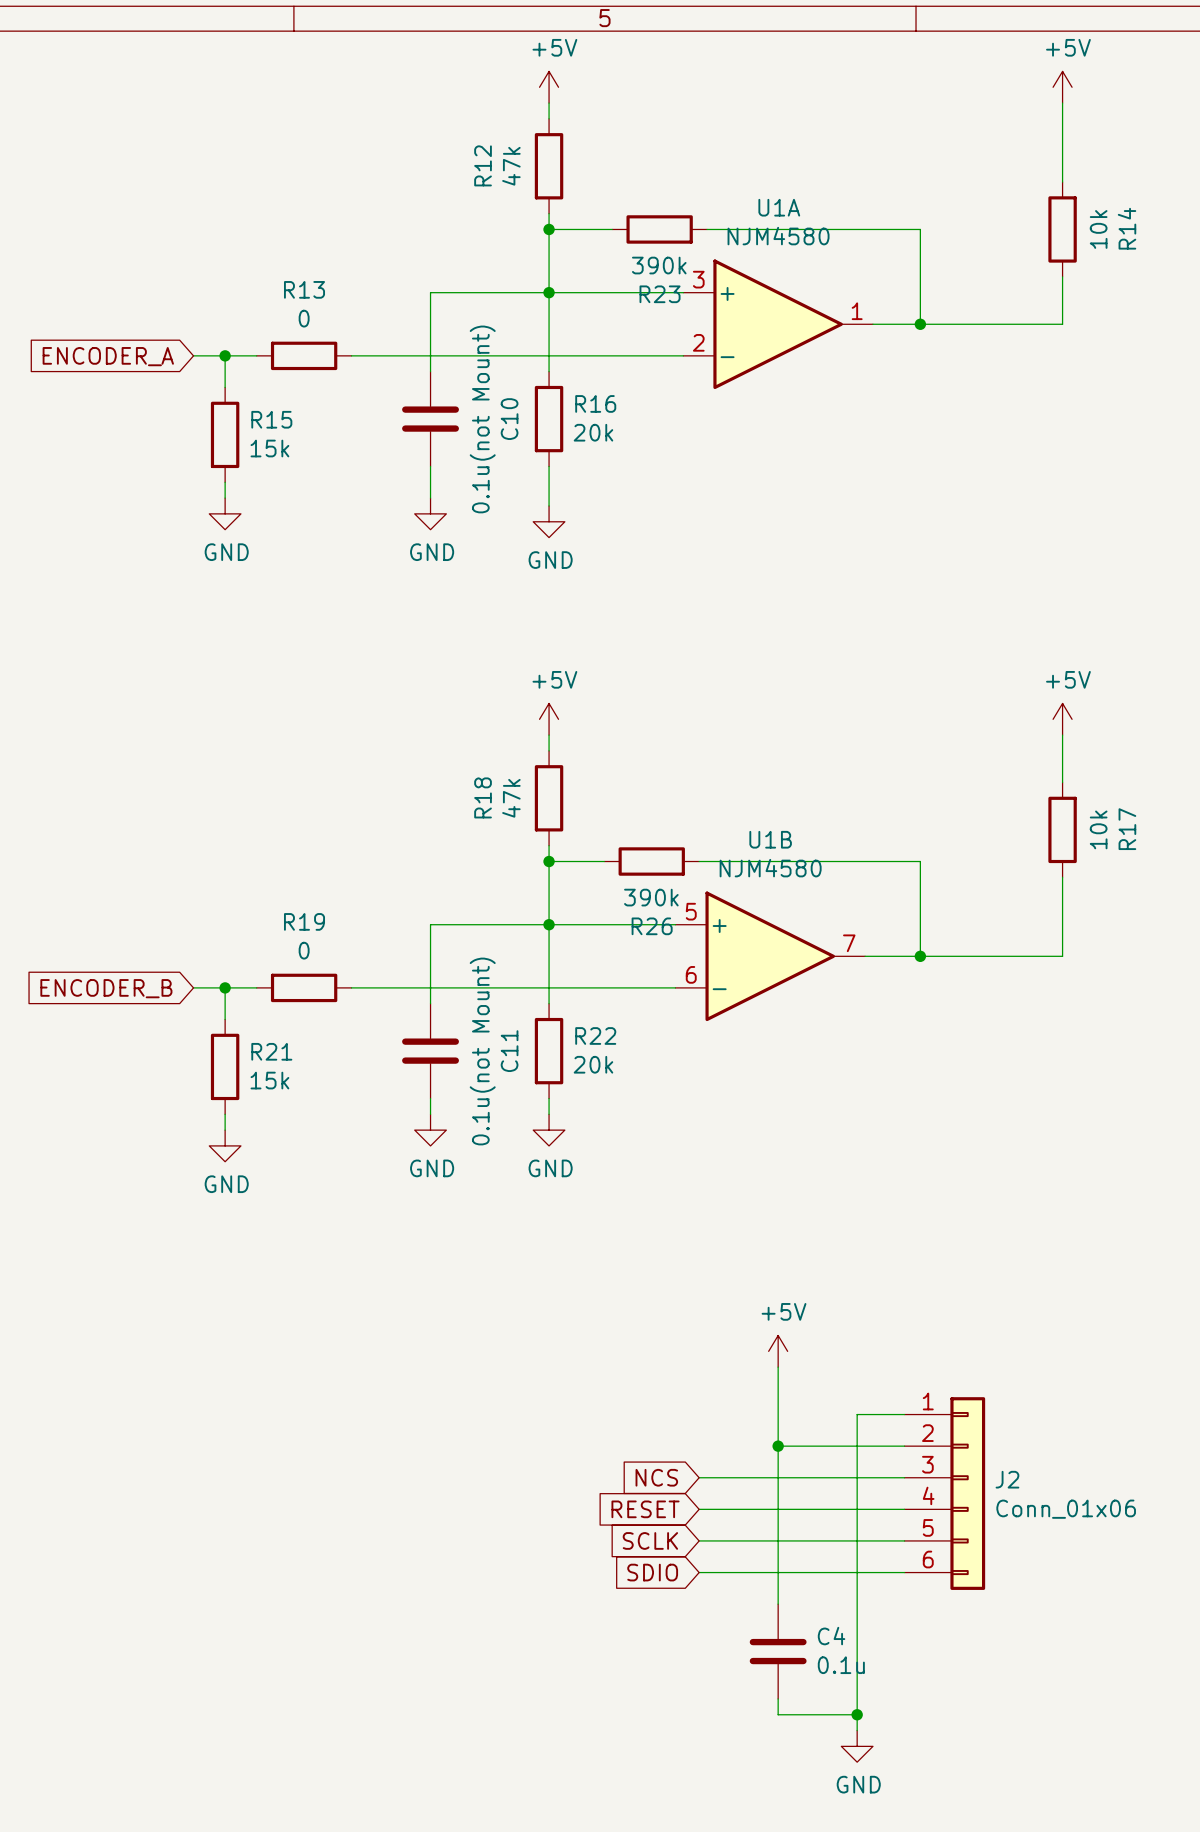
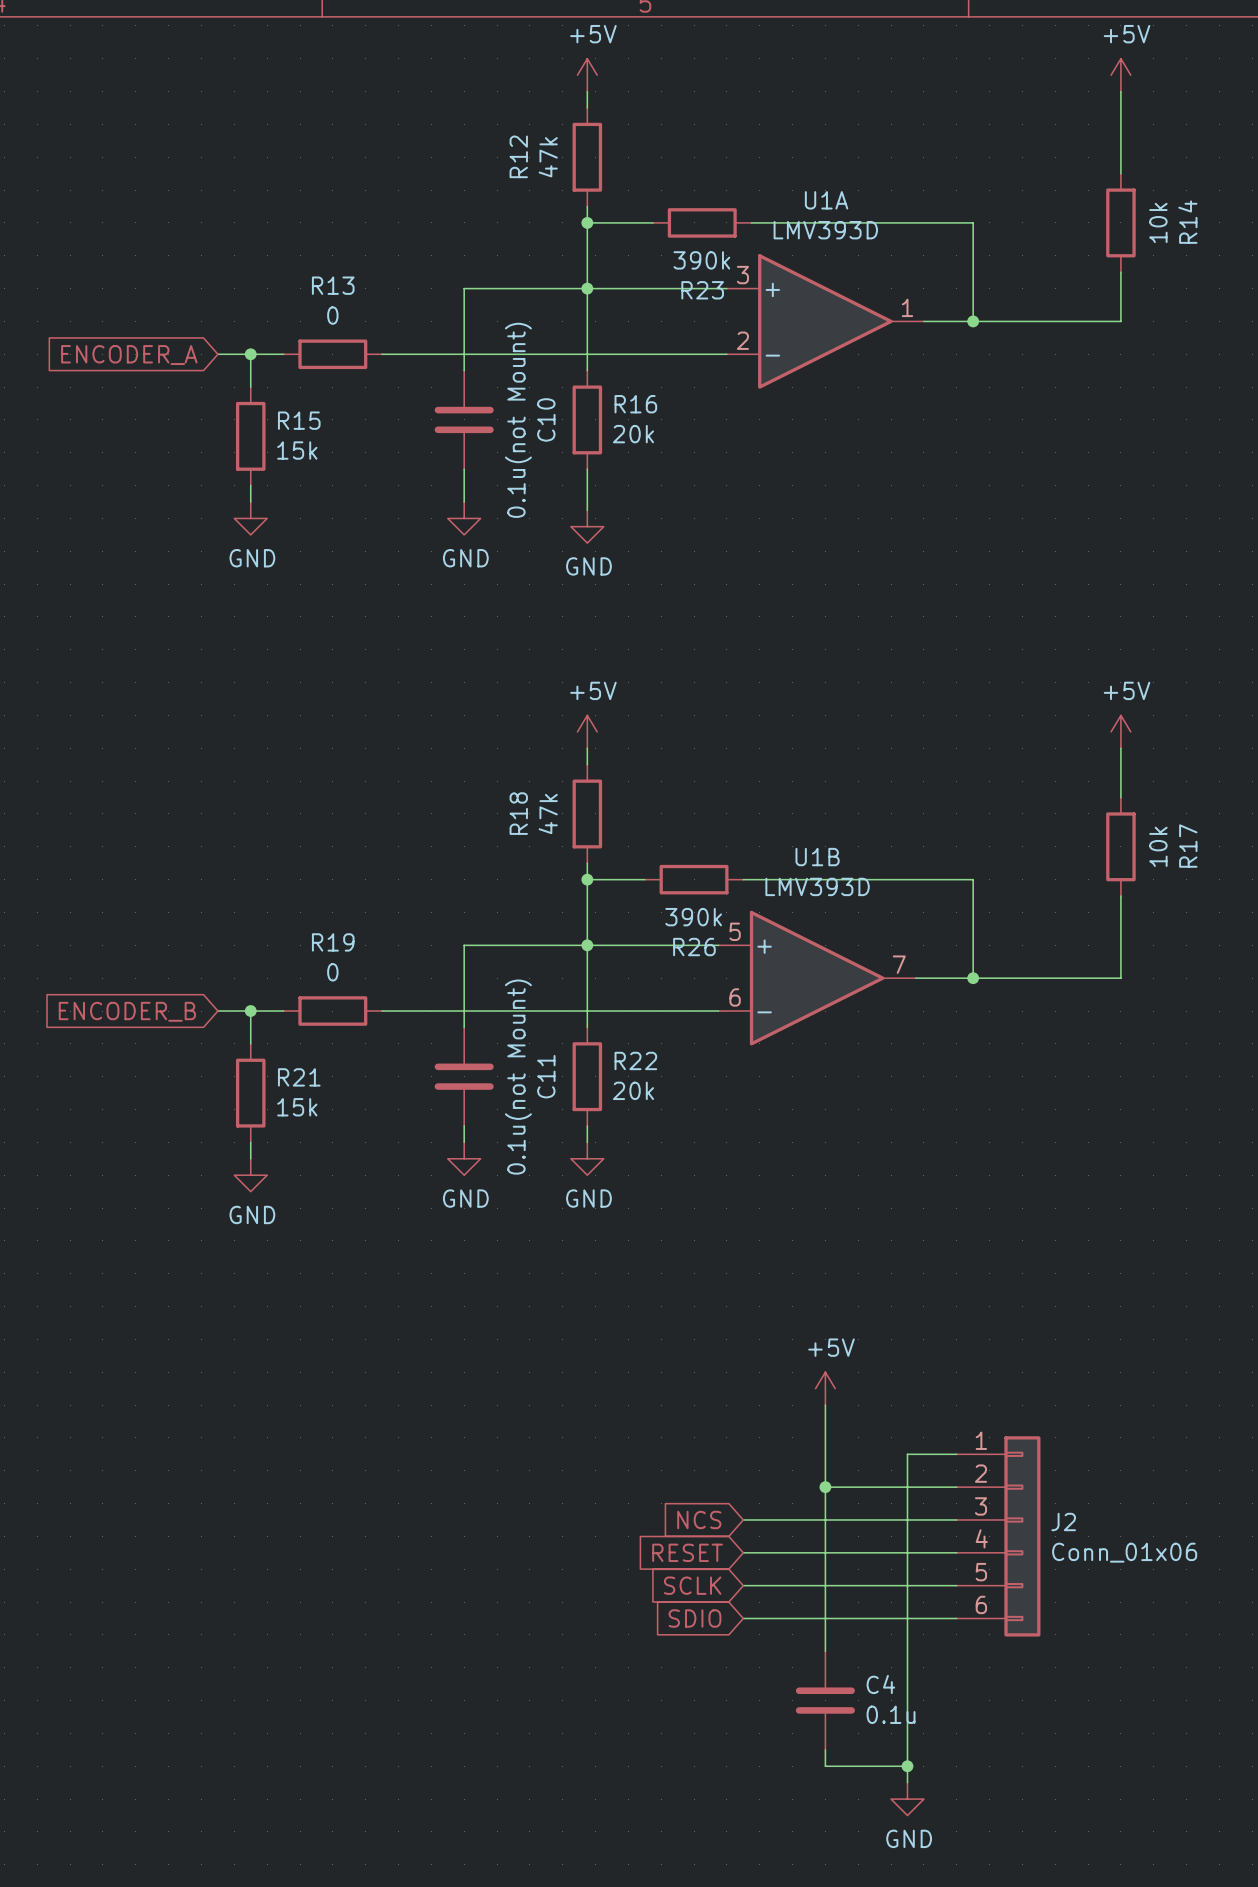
U1A value: NJM4580 (778, 236) -> LMV393D (825, 230)
U1B value: NJM4580 (770, 868) -> LMV393D (817, 886)

